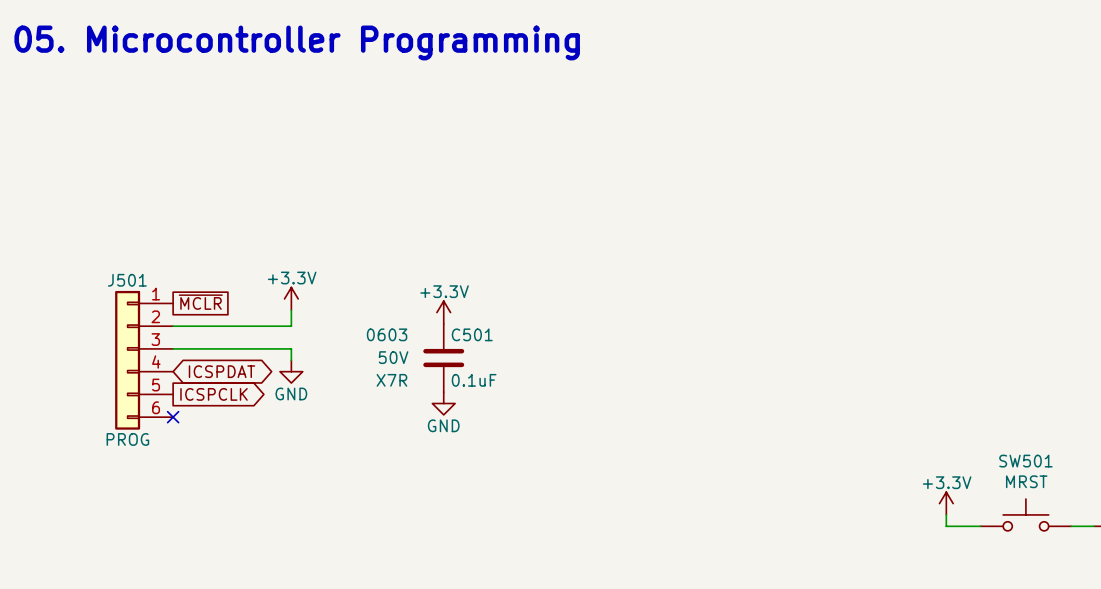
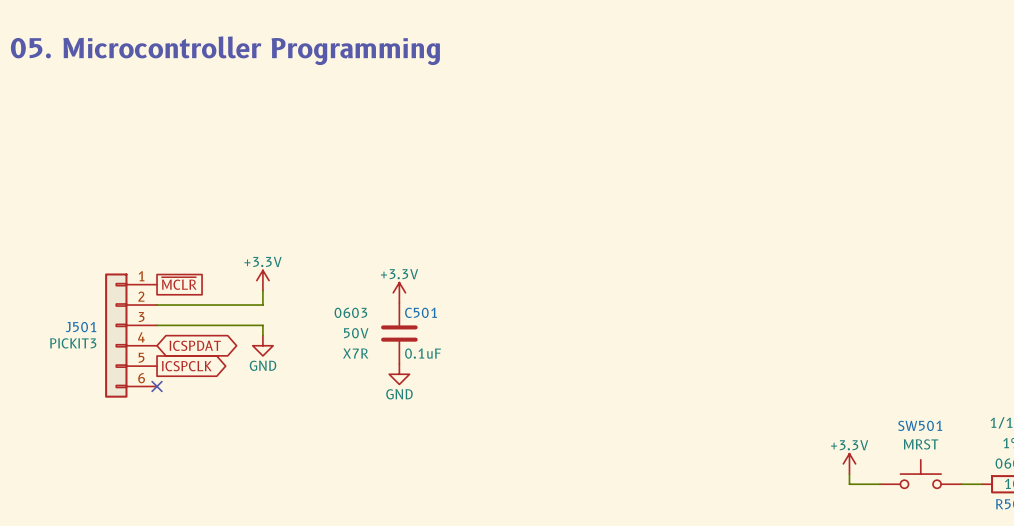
J501 name position: J501 (127, 280) -> J501 (81, 327)
J501 value: PROG (127, 439) -> PICKIT3 (73, 343)

